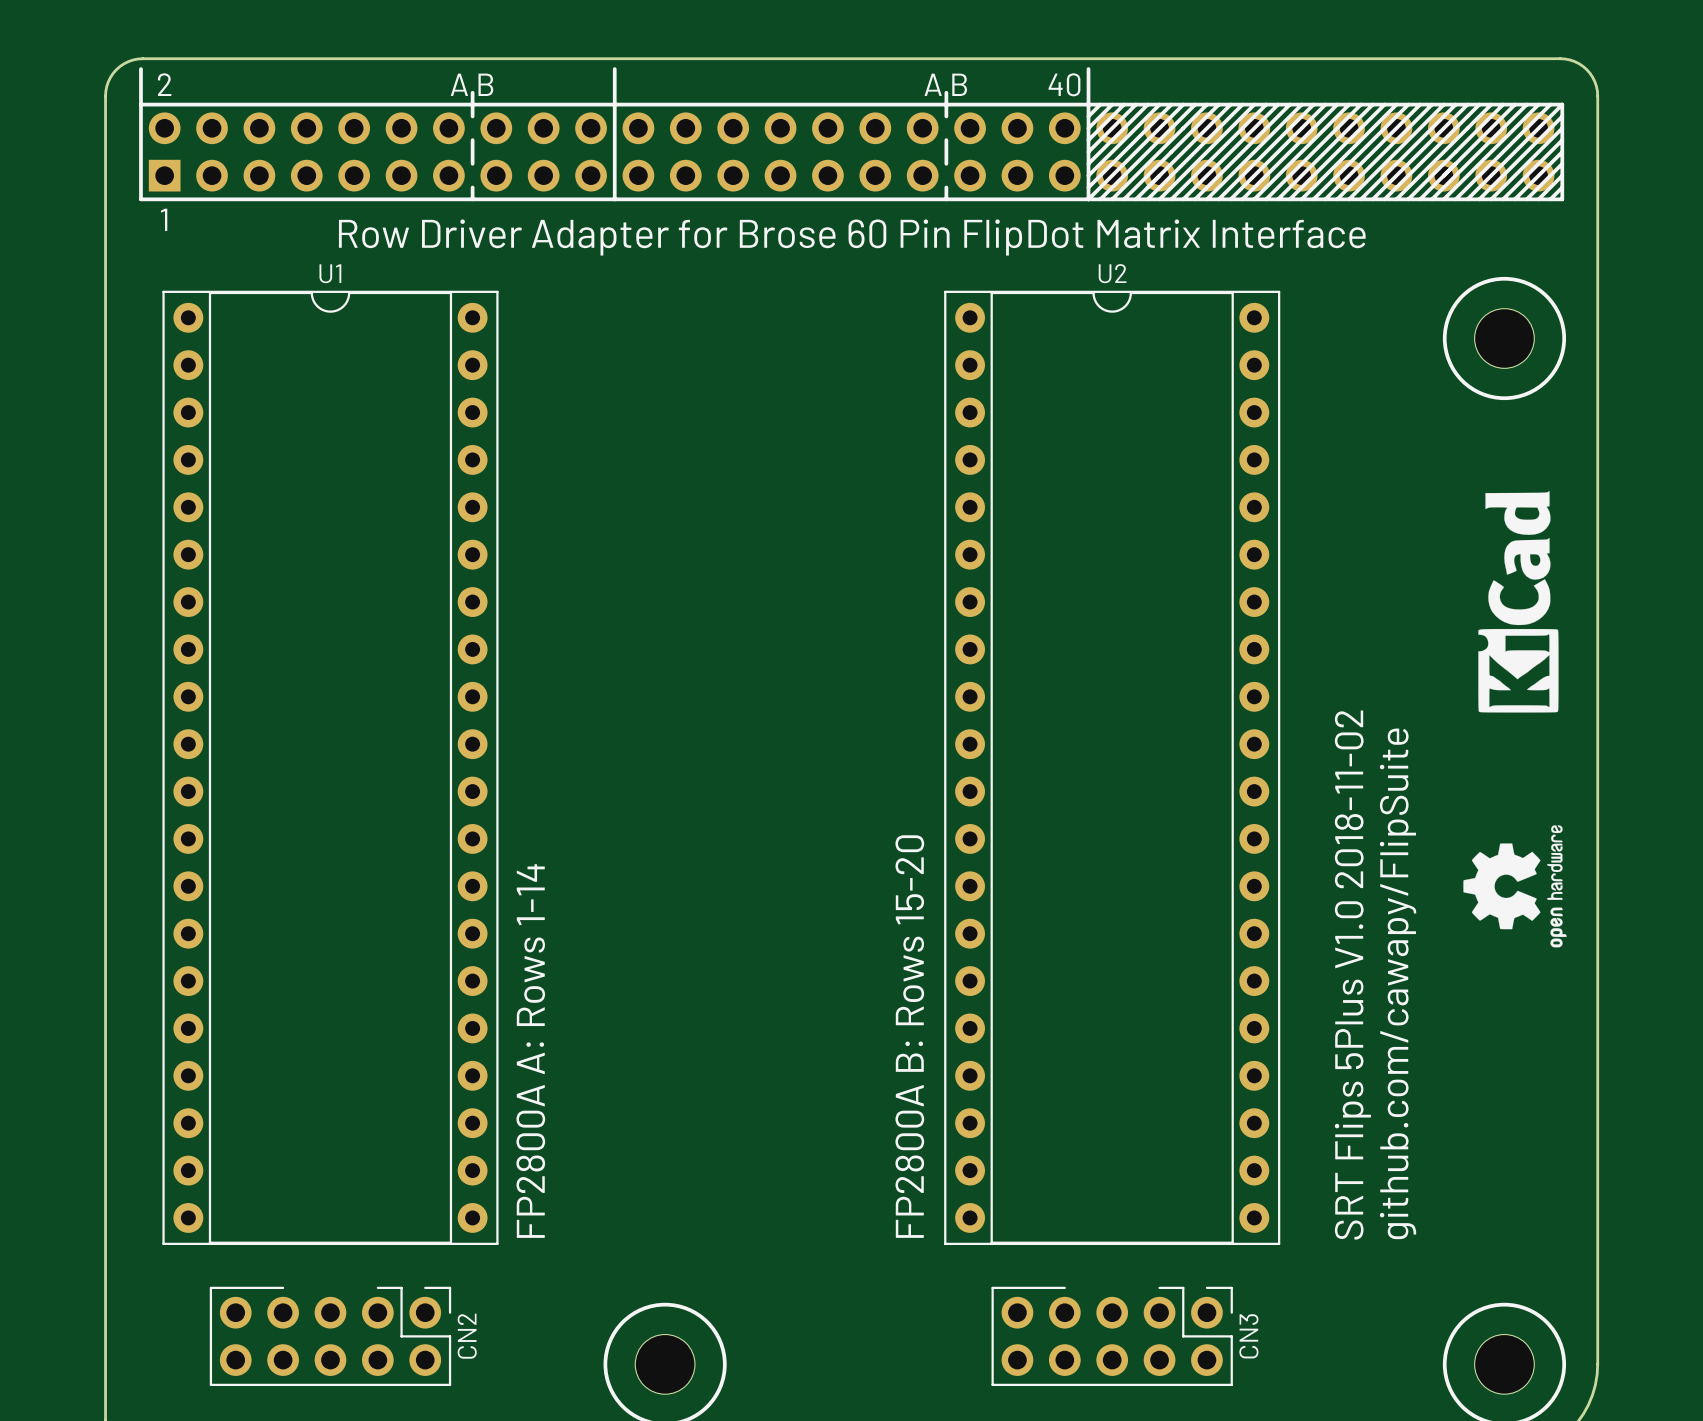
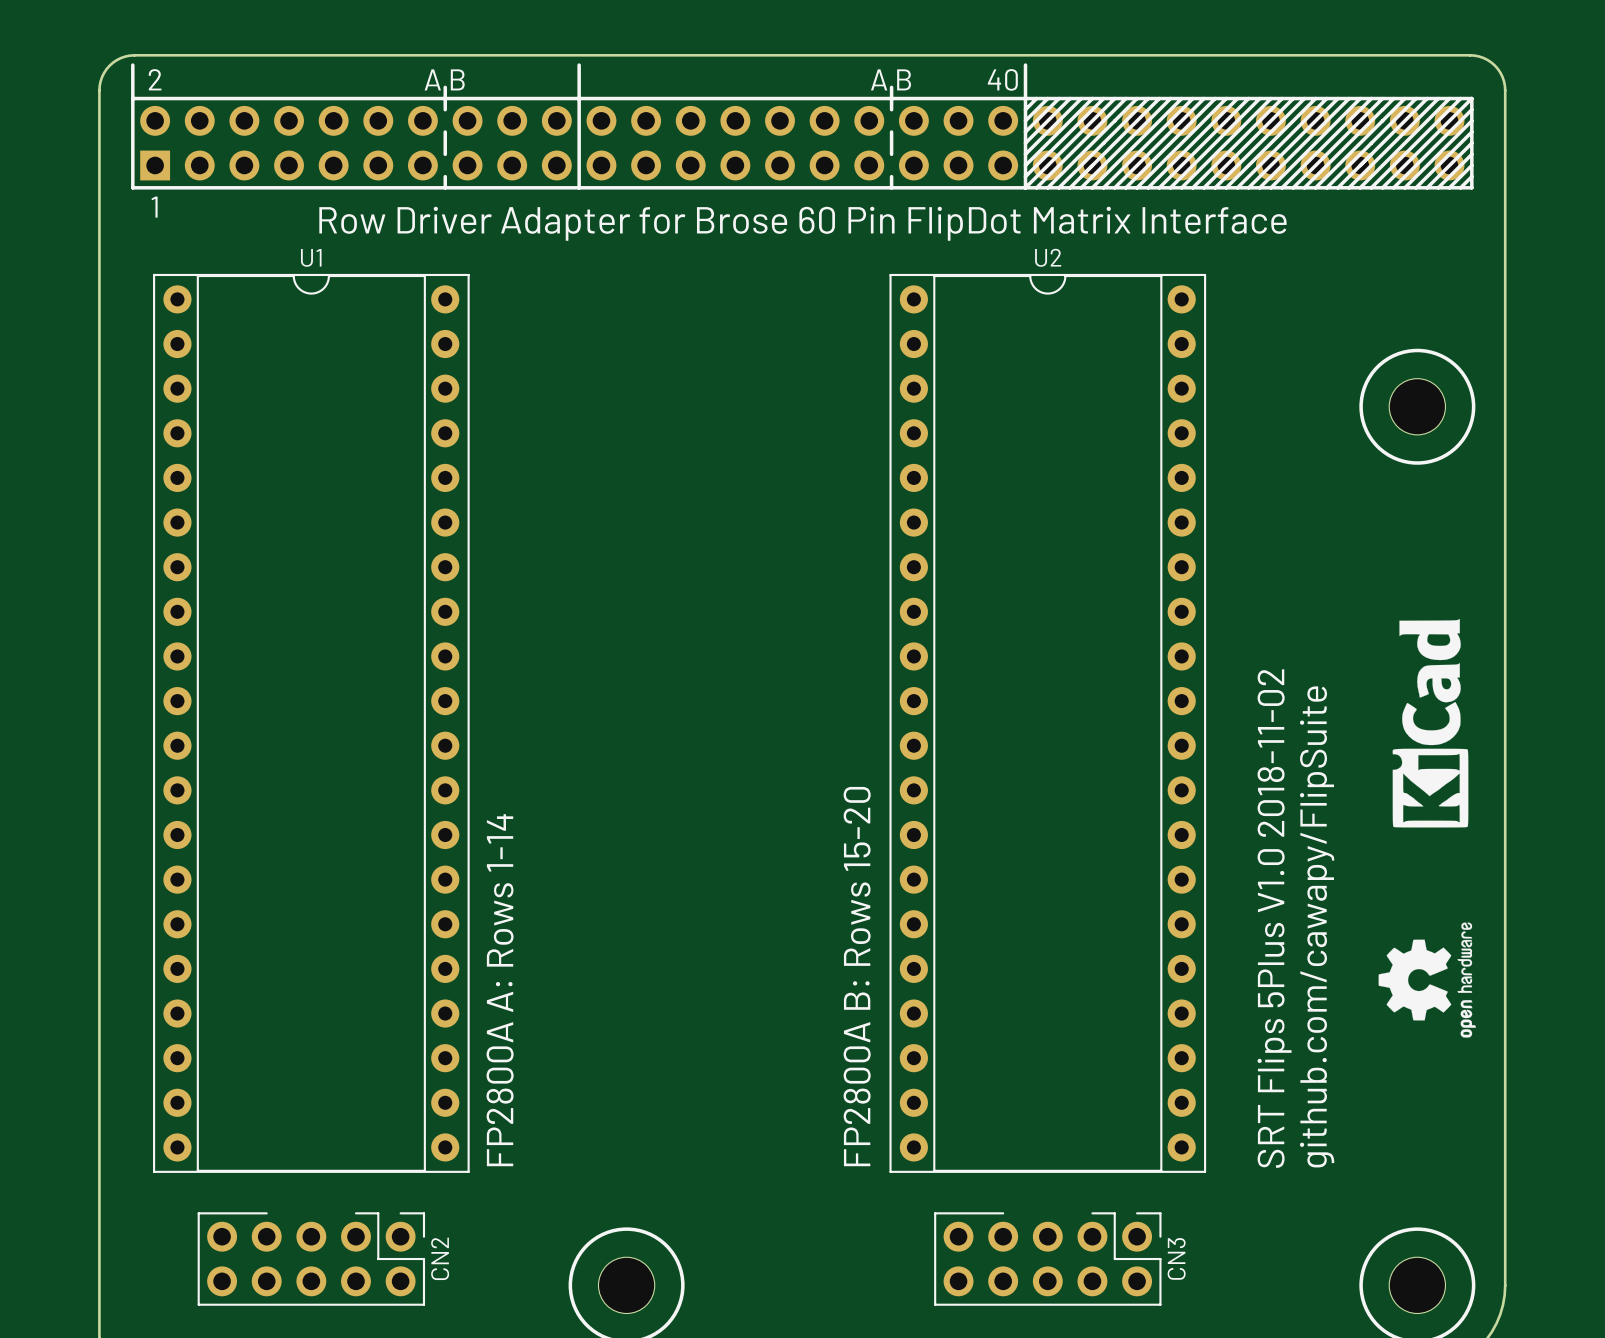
part position: (1504, 338) -> (1417, 406)
drawing position: (1504, 338) -> (1417, 406)
drawing position: (1518, 601) -> (1430, 723)
drawing position: (1515, 886) -> (1427, 980)

